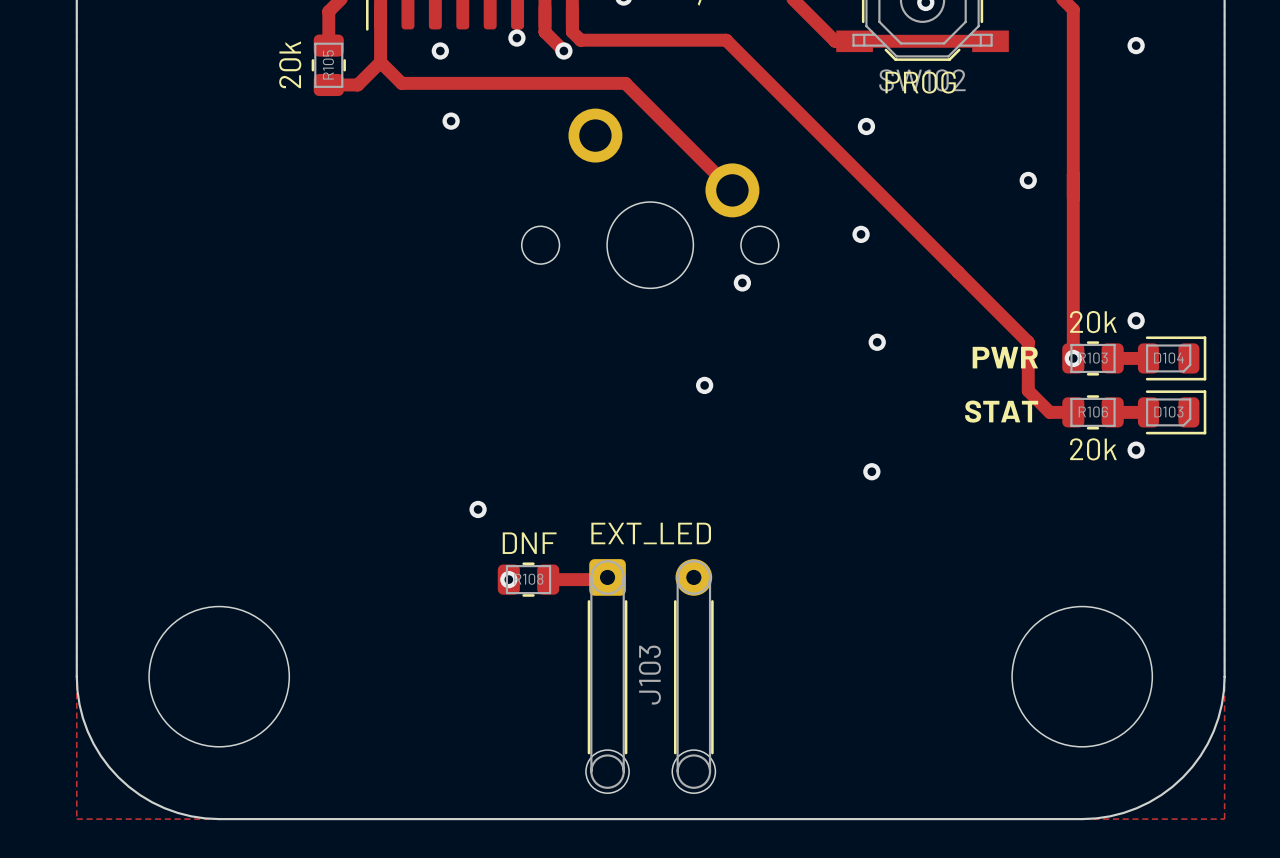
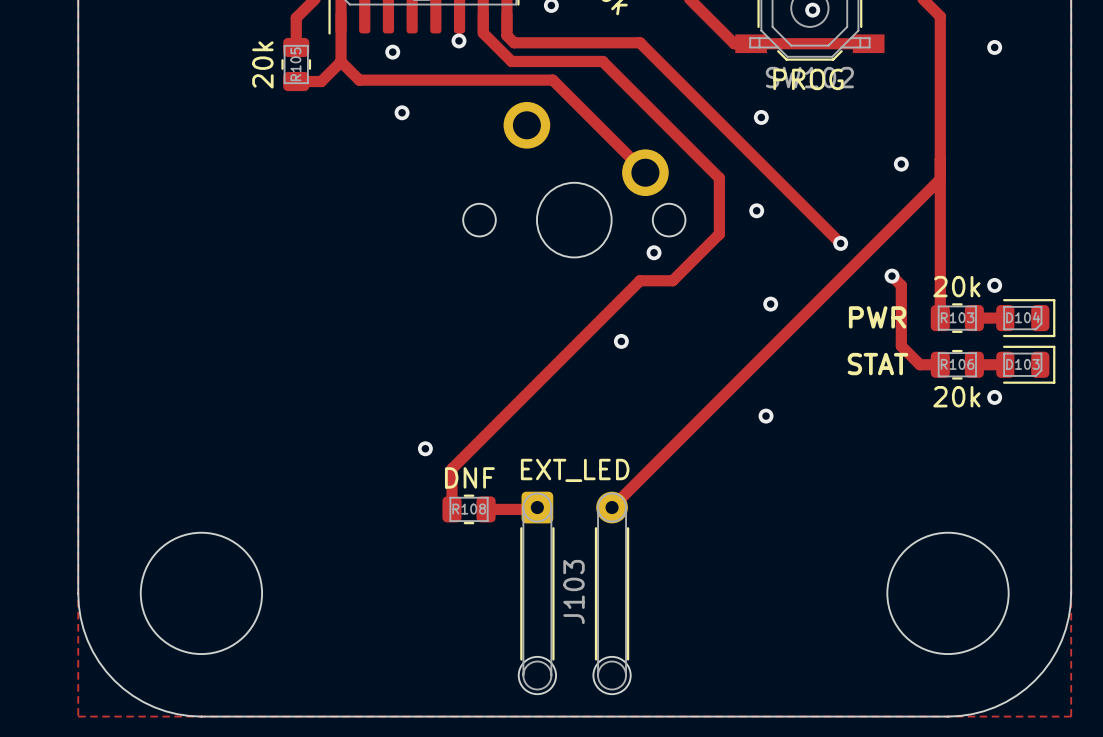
track: (544, 29) (544, 32) (563, 50) -> (483, 33) (511, 61) (602, 61) (719, 178) (719, 234) (672, 280) (640, 280) (451, 468) (451, 509)
via: (563, 50) -> none
track: none -> (940, 179) (611, 507)
track: (958, 272) (1028, 342) -> (892, 276) (901, 285) (901, 304)
via: none -> (840, 243)
via: none -> (892, 276)
via: (1073, 358) -> none
via: (508, 579) -> none

